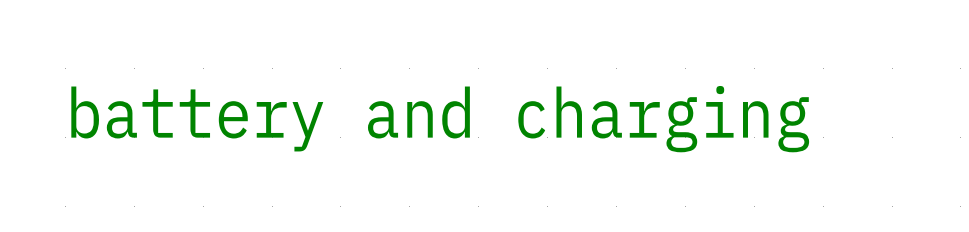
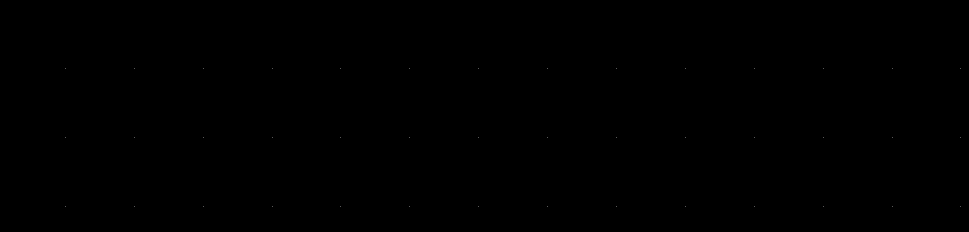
text: battery and charging (440, 119) -> none

